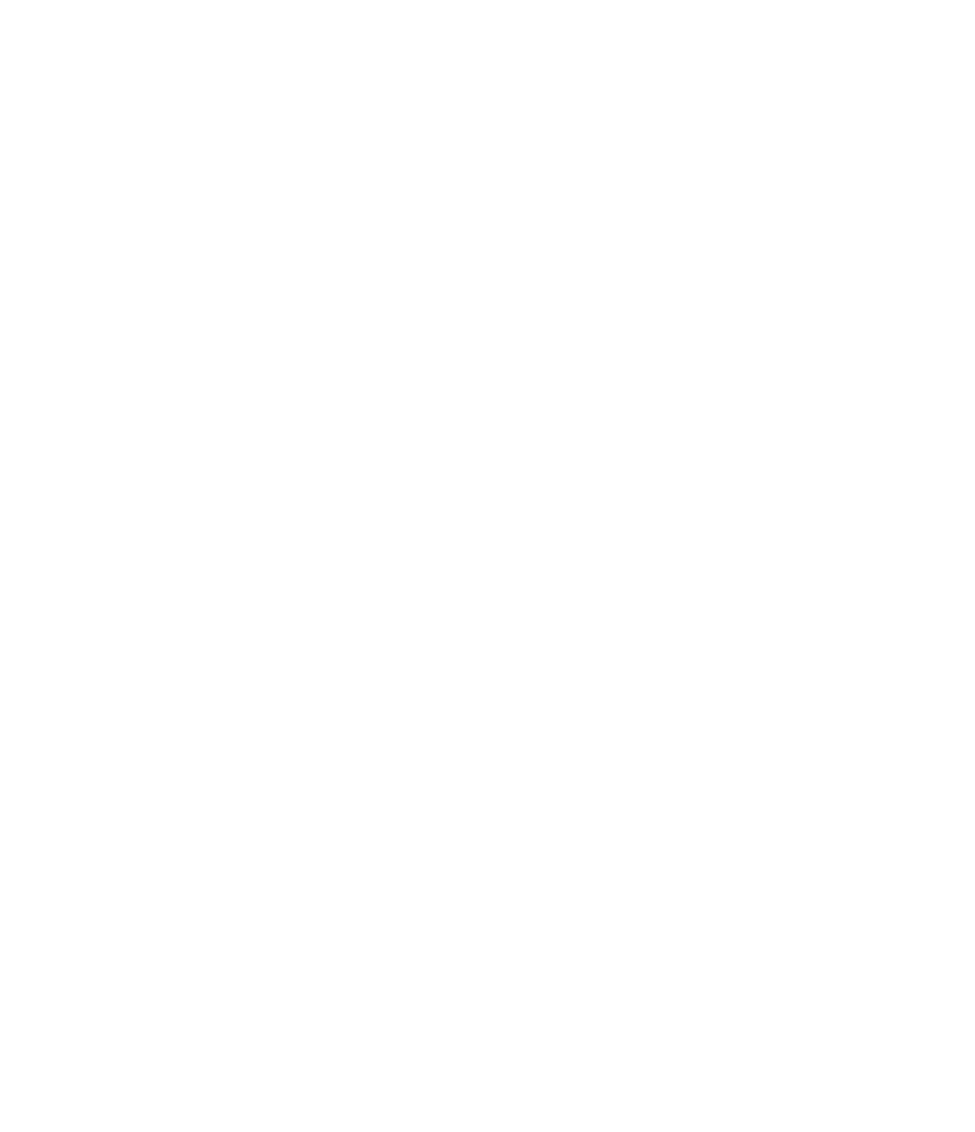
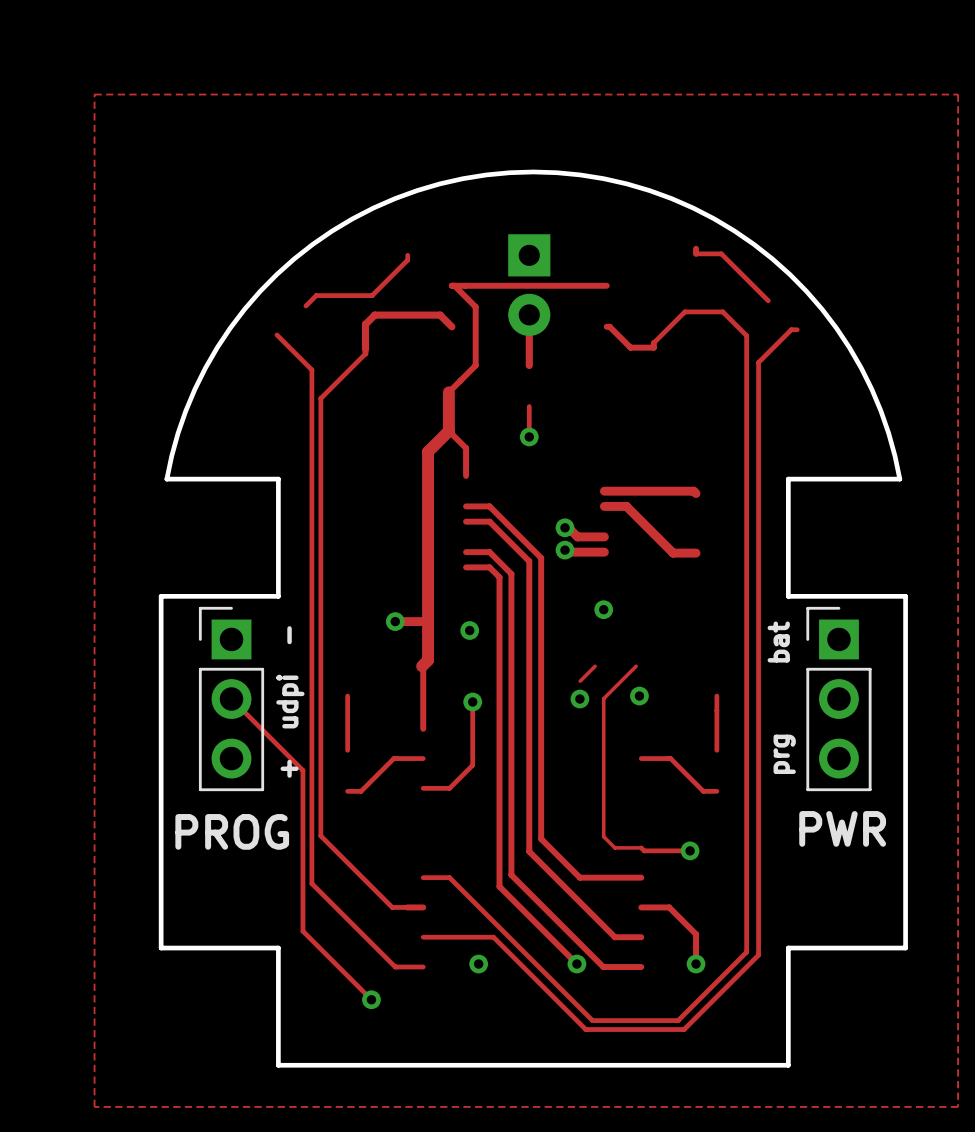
zone outline: none -> (94, 94) (958, 94) (958, 1106) (94, 1106) (94, 94)
track: none -> (696, 248) (696, 253) (721, 253) (768, 300)
track: none -> (407, 255) (407, 260) (372, 295) (316, 295) (305, 305)
track: none -> (451, 285) (606, 285)
track: none -> (454, 285) (475, 306) (475, 365) (448, 392) (448, 431)
part: none -> (529, 285)
track: none -> (529, 314) (529, 365)
track: none -> (451, 326) (440, 315) (374, 315) (365, 324) (365, 353) (320, 398) (320, 835) (392, 907) (423, 907)
track: none -> (606, 326) (609, 326) (630, 347) (653, 347) (653, 342) (684, 311) (722, 311) (746, 335) (746, 952) (678, 1020) (592, 1020) (449, 877) (423, 877)
track: none -> (797, 329) (791, 329) (758, 362) (758, 955) (684, 1029) (585, 1029) (493, 937) (423, 937)
track: none -> (276, 334) (311, 369) (311, 883) (395, 967) (423, 967)
track: none -> (529, 406) (529, 436)
track: none -> (448, 431) (466, 448) (466, 475)
track: none -> (448, 431) (428, 451) (428, 660) (422, 666) (423, 728)
via: none -> (529, 436)
board edge: none -> (166, 479) (278, 479) (278, 596) (161, 596) (161, 948) (278, 948) (278, 1065) (788, 1065) (788, 948) (905, 948) (905, 596) (788, 596) (788, 479) (899, 479) (894, 456) (871, 389) (836, 328) (790, 274) (734, 230) (693, 208) (649, 190) (580, 174) (533, 171) (486, 174) (439, 183) (395, 198) (352, 218) (312, 244) (276, 274) (244, 309) (217, 347) (194, 389) (178, 433) (166, 479)
track: none -> (604, 491) (693, 491) (696, 493)
track: none -> (466, 506) (489, 506) (541, 558) (541, 838) (579, 877) (641, 877)
track: none -> (604, 506) (626, 506) (673, 553) (696, 553)
track: none -> (466, 521) (489, 521) (529, 561) (529, 851) (614, 937) (641, 937)
track: none -> (565, 527) (568, 527) (577, 536) (604, 536)
via: none -> (565, 527)
track: none -> (565, 550) (567, 552) (604, 552)
via: none -> (565, 550)
track: none -> (466, 552) (489, 552) (511, 573) (511, 875) (603, 967) (641, 967)
track: none -> (466, 567) (489, 567) (499, 577) (499, 886) (576, 964)
via: none -> (603, 609)
track: none -> (395, 621) (428, 621)
via: none -> (395, 621)
via: none -> (469, 630)
track: none -> (595, 666) (580, 681)
track: none -> (636, 666) (603, 698) (603, 836) (614, 847) (641, 847) (644, 850) (690, 850)
track: none -> (347, 696) (347, 750)
via: none -> (639, 696)
track: none -> (716, 696) (716, 750)
text: none -> prg bat (781, 697)
track: none -> (231, 699) (302, 770) (302, 931) (371, 999)
part: none -> (231, 699)
via: none -> (579, 699)
part: none -> (838, 699)
text: none -> + udpi - (290, 701)
track: none -> (472, 701) (472, 765) (449, 788) (423, 788)
via: none -> (472, 701)
track: none -> (423, 758) (393, 758) (361, 791) (347, 791)
track: none -> (641, 758) (670, 758) (703, 791) (716, 791)
text: none -> PWR (842, 828)
text: none -> PROG (232, 831)
via: none -> (690, 850)
track: none -> (641, 907) (669, 907) (696, 934) (696, 964)
via: none -> (478, 964)
via: none -> (576, 964)
via: none -> (696, 964)
via: none -> (371, 999)

